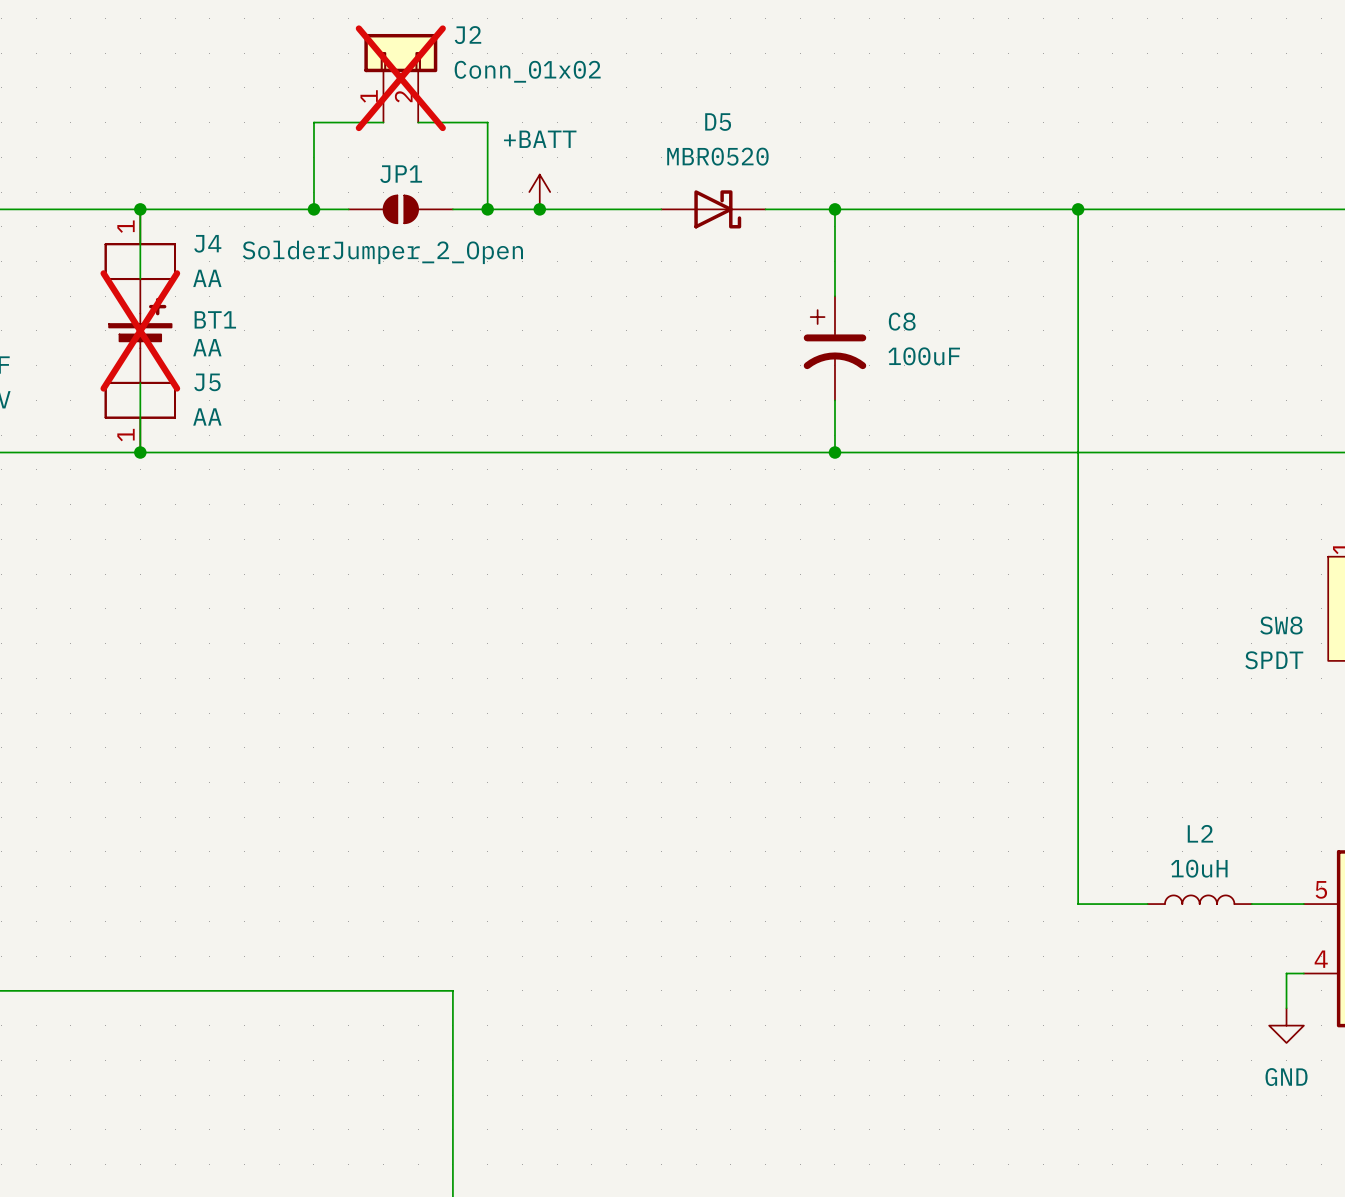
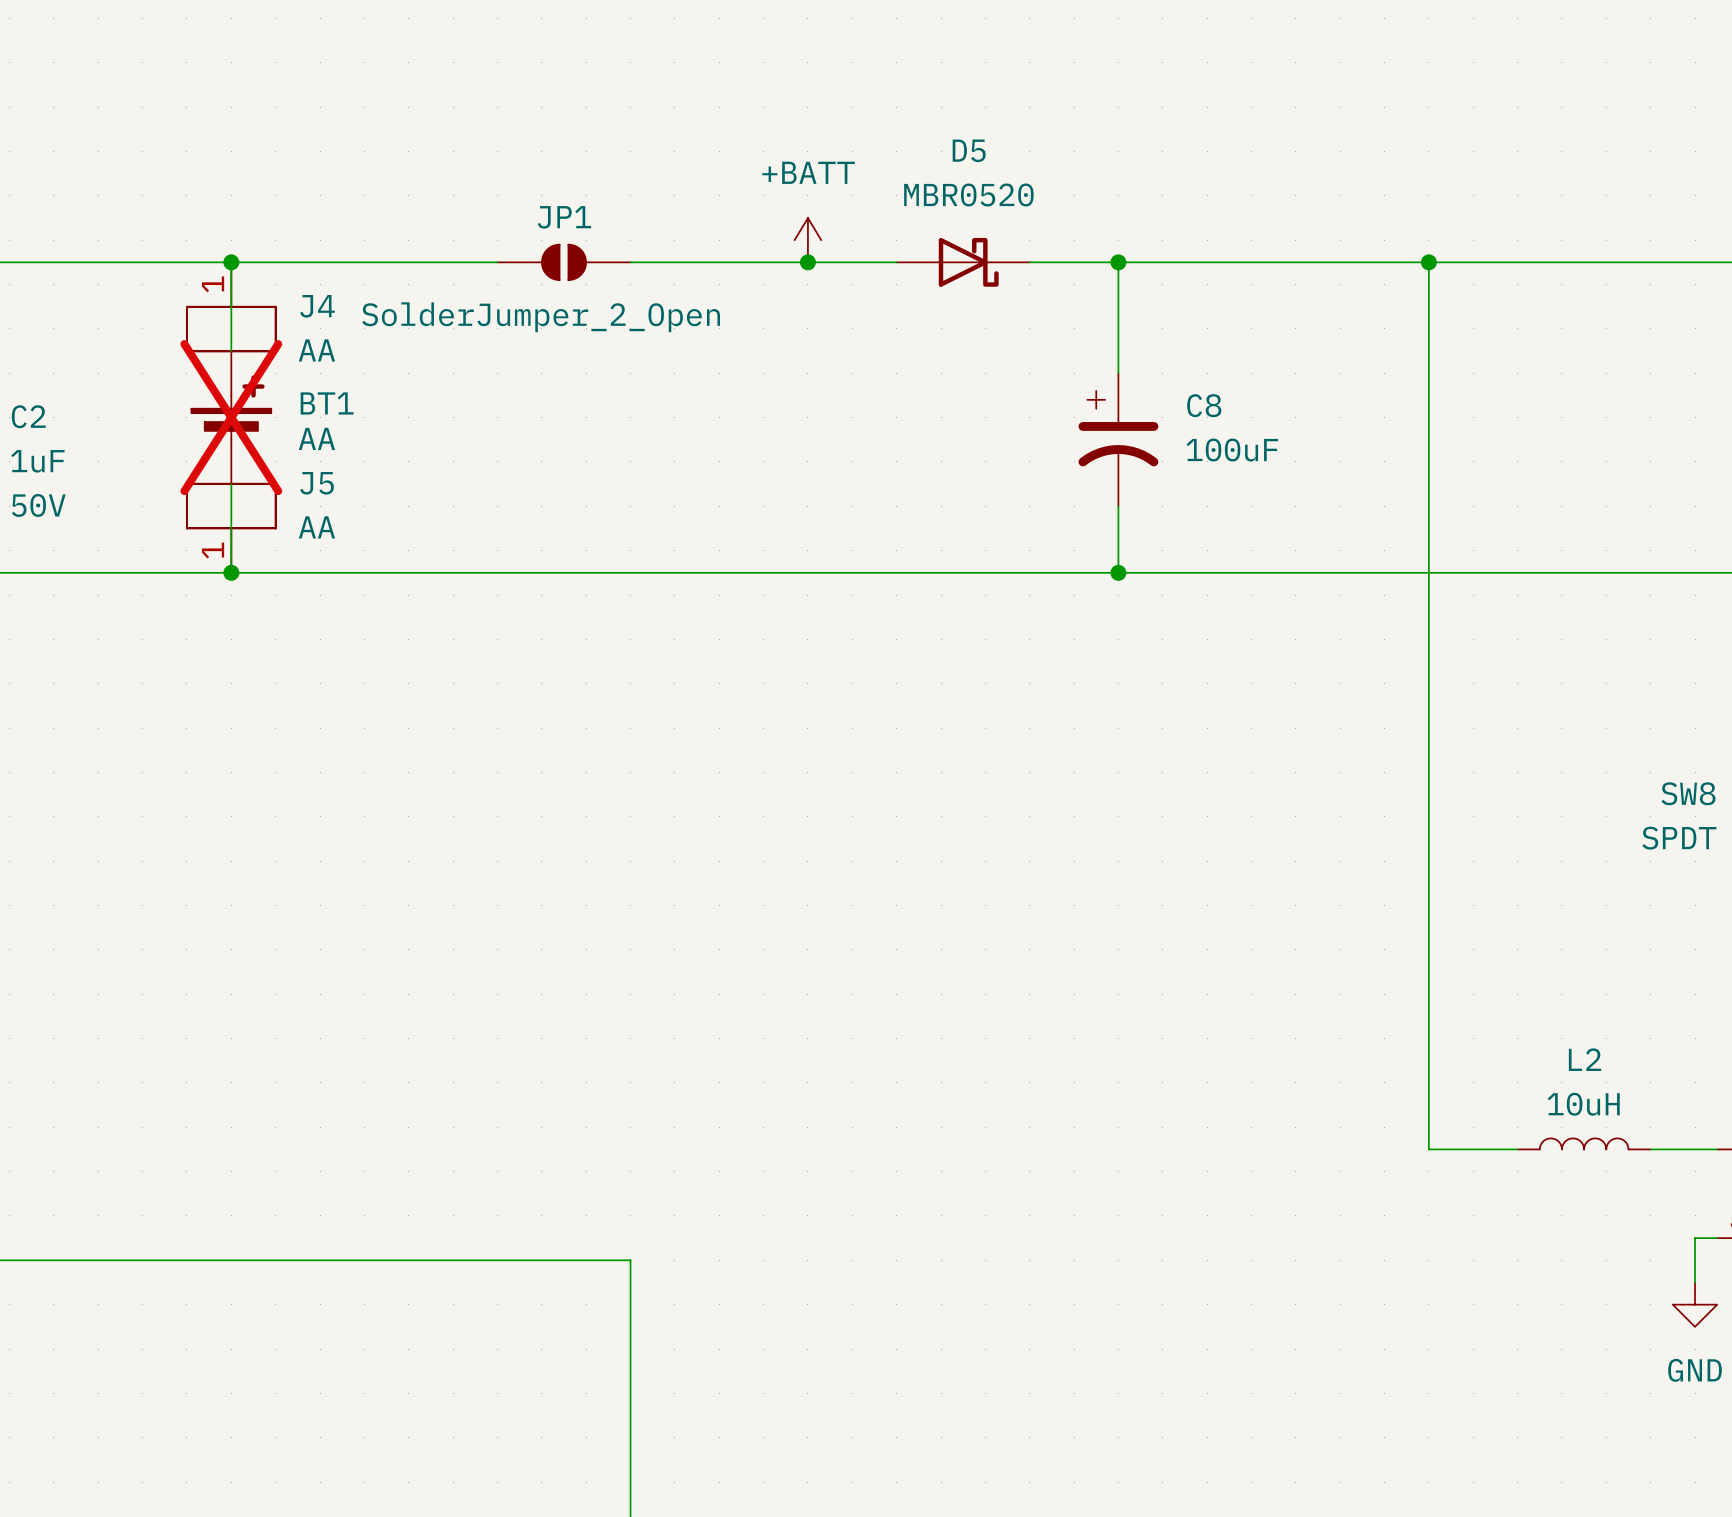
J2: Conn_01x02 (400, 78) -> none
wire: (383, 122) (313, 122) (313, 209) -> none
wire: (418, 122) (487, 122) (487, 209) -> none
power symbol position: +BATT (539, 192) -> +BATT (807, 240)
junction: (313, 209) -> none
junction: (487, 209) -> none
junction: (539, 209) -> none
junction: none -> (807, 262)

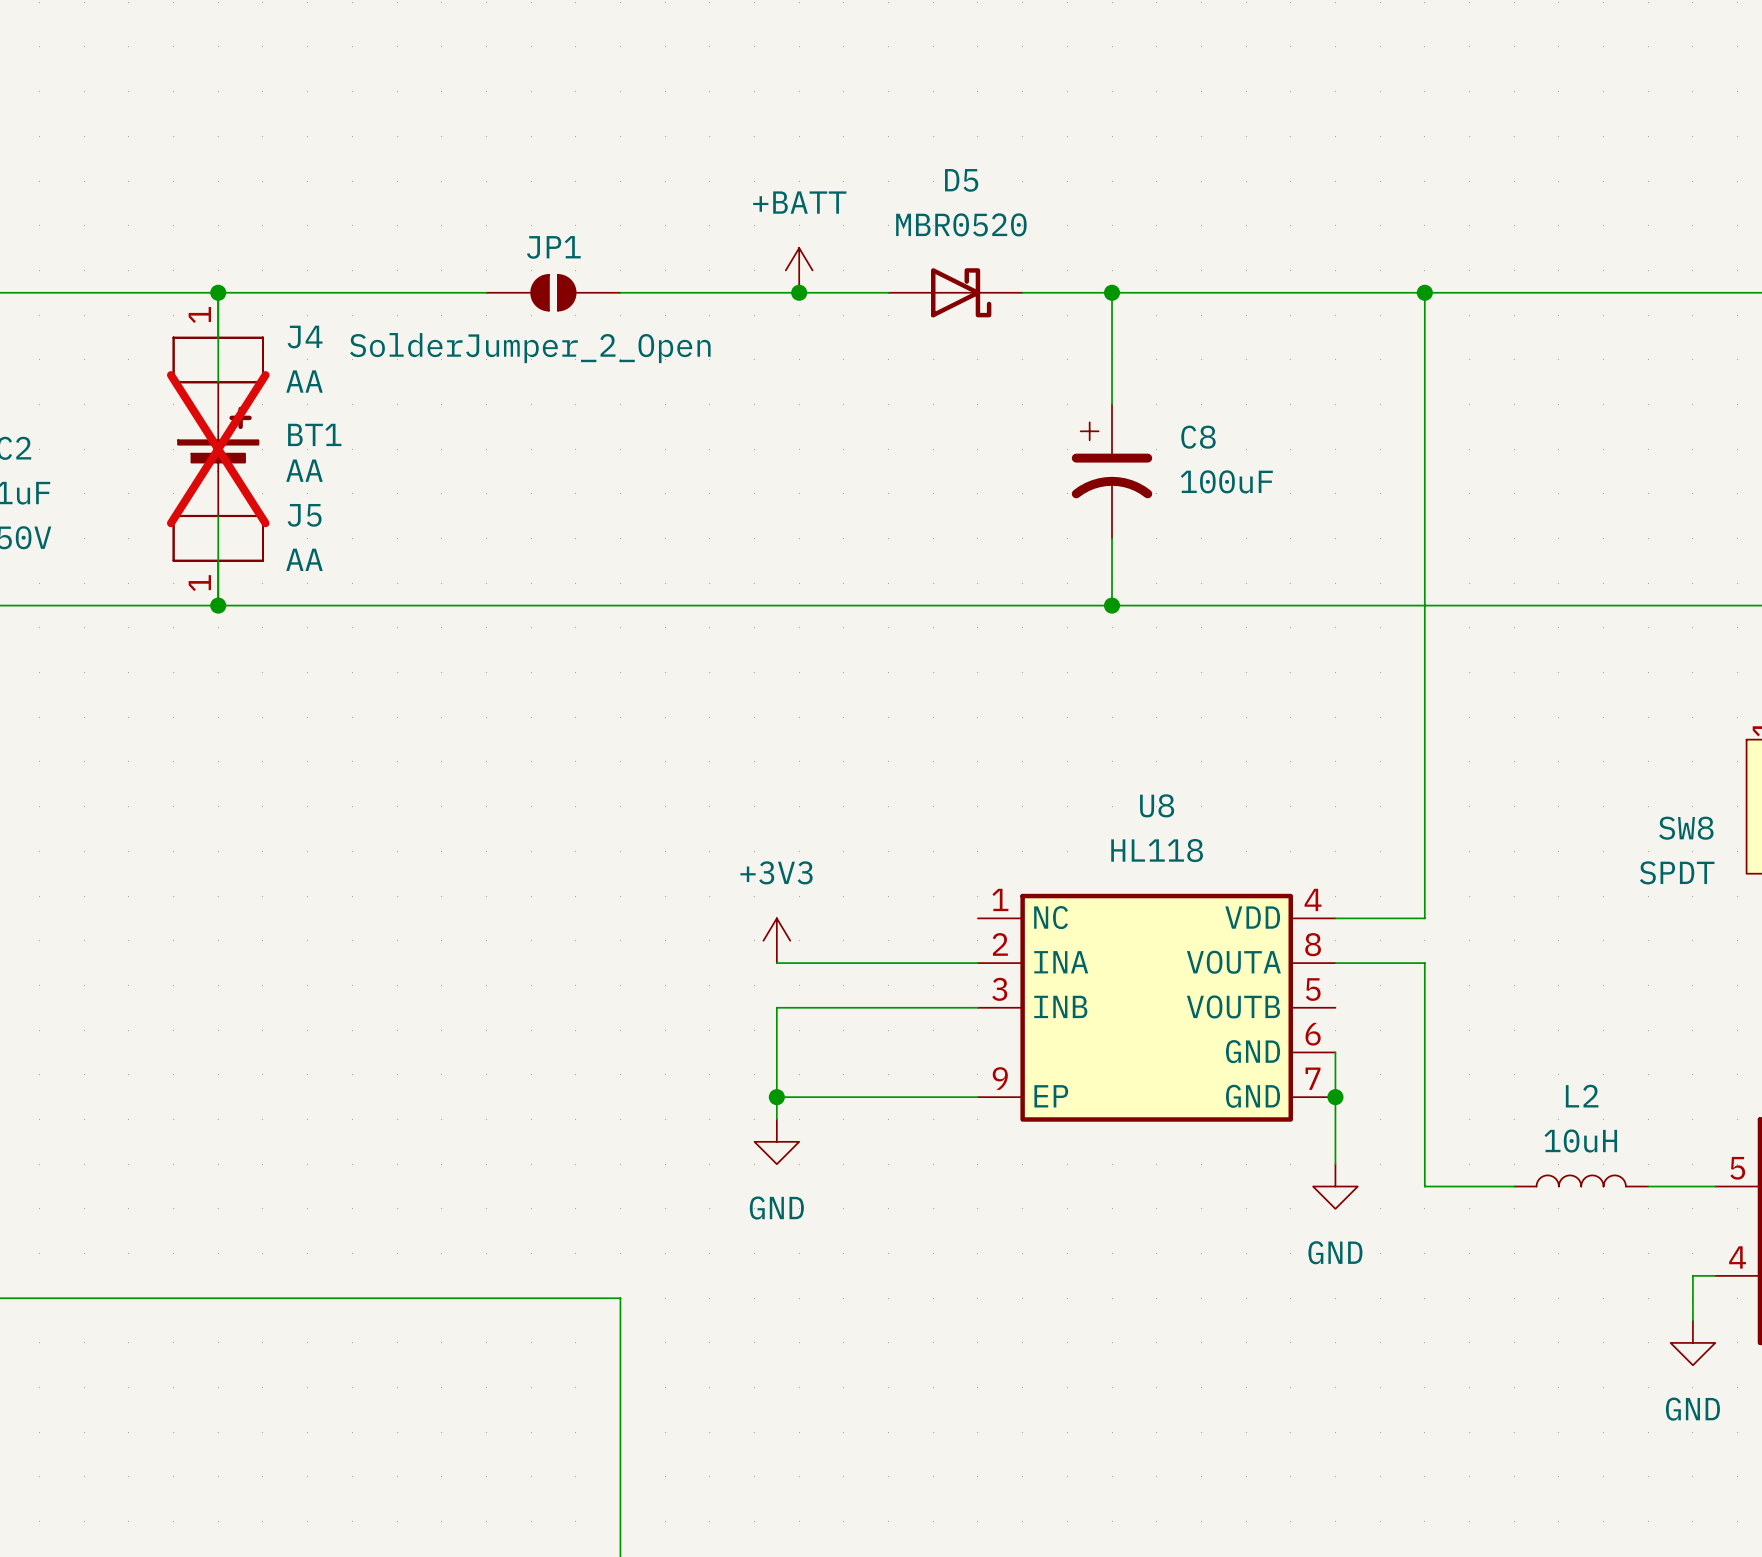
wire: (1428, 883) (1428, 927) -> (1424, 918) (1335, 918)
power symbol: none -> +3V3 (776, 940)
wire: none -> (776, 963) (977, 963)
wire: none -> (1335, 963) (1424, 963)
wire: none -> (977, 1007) (776, 1007) (776, 1119)
U8: none -> HL118 (1156, 1007)
wire: none -> (1335, 1052) (1335, 1164)
wire: none -> (776, 1097) (977, 1097)
junction: none -> (776, 1097)
junction: none -> (1335, 1097)
power symbol: none -> GND (776, 1141)
power symbol: none -> GND (1335, 1186)

